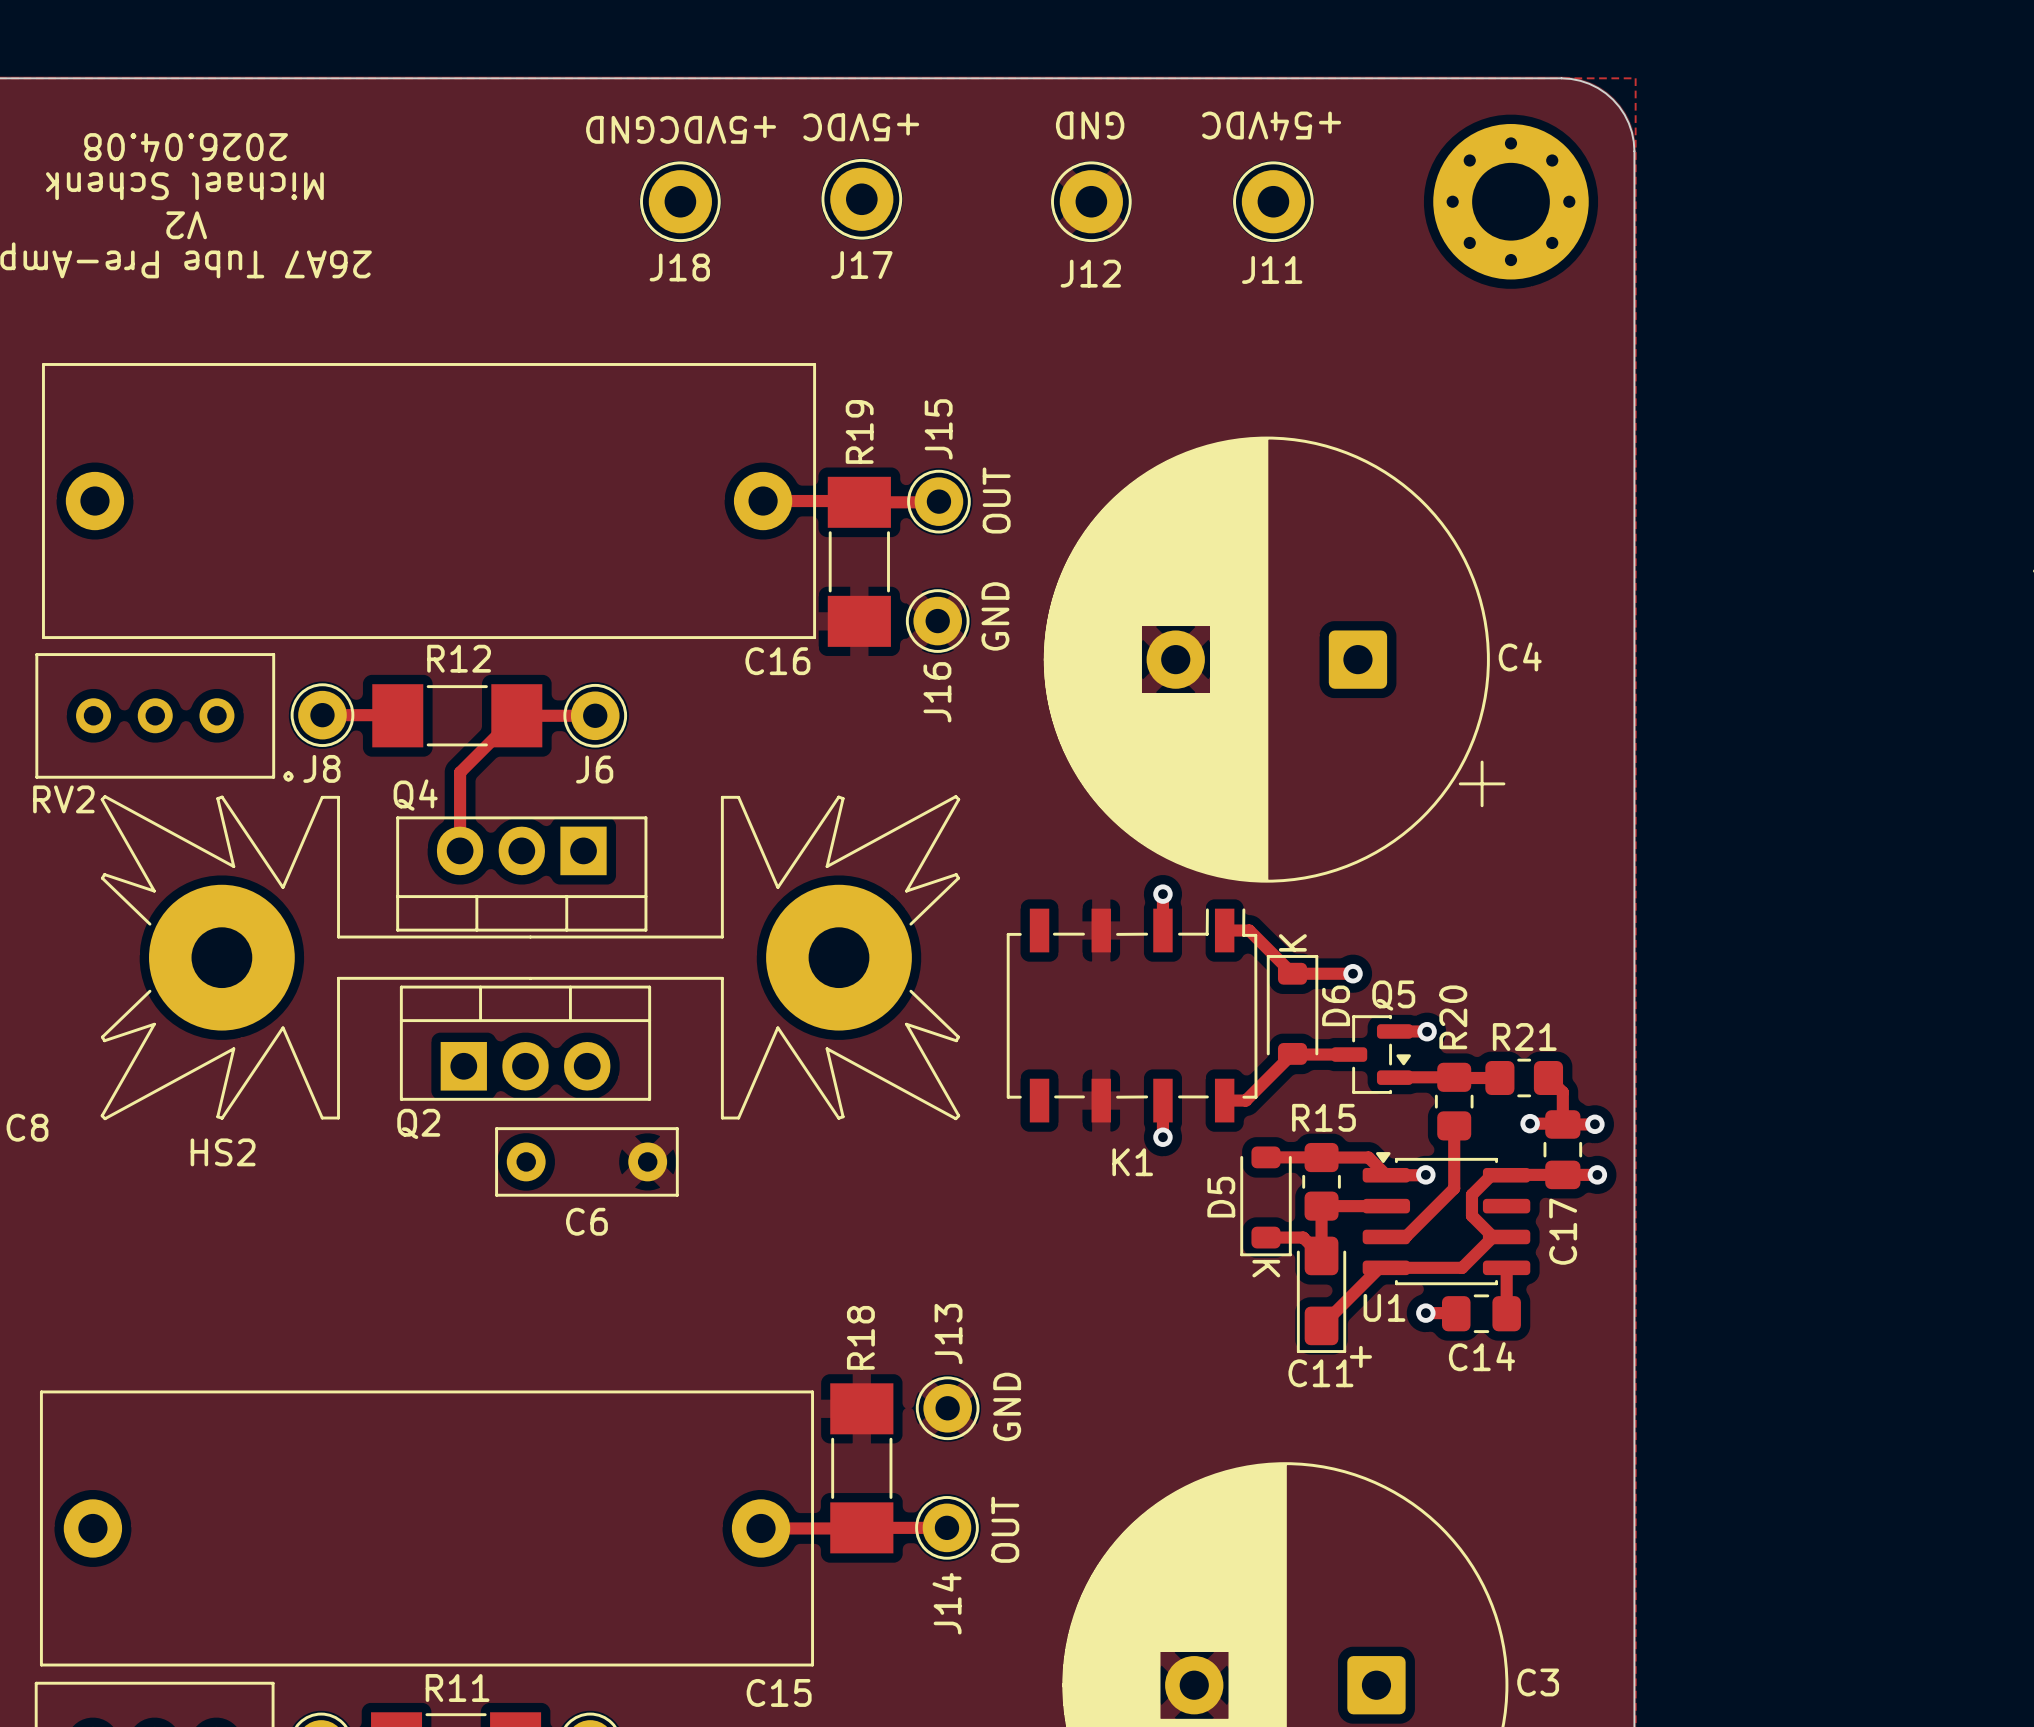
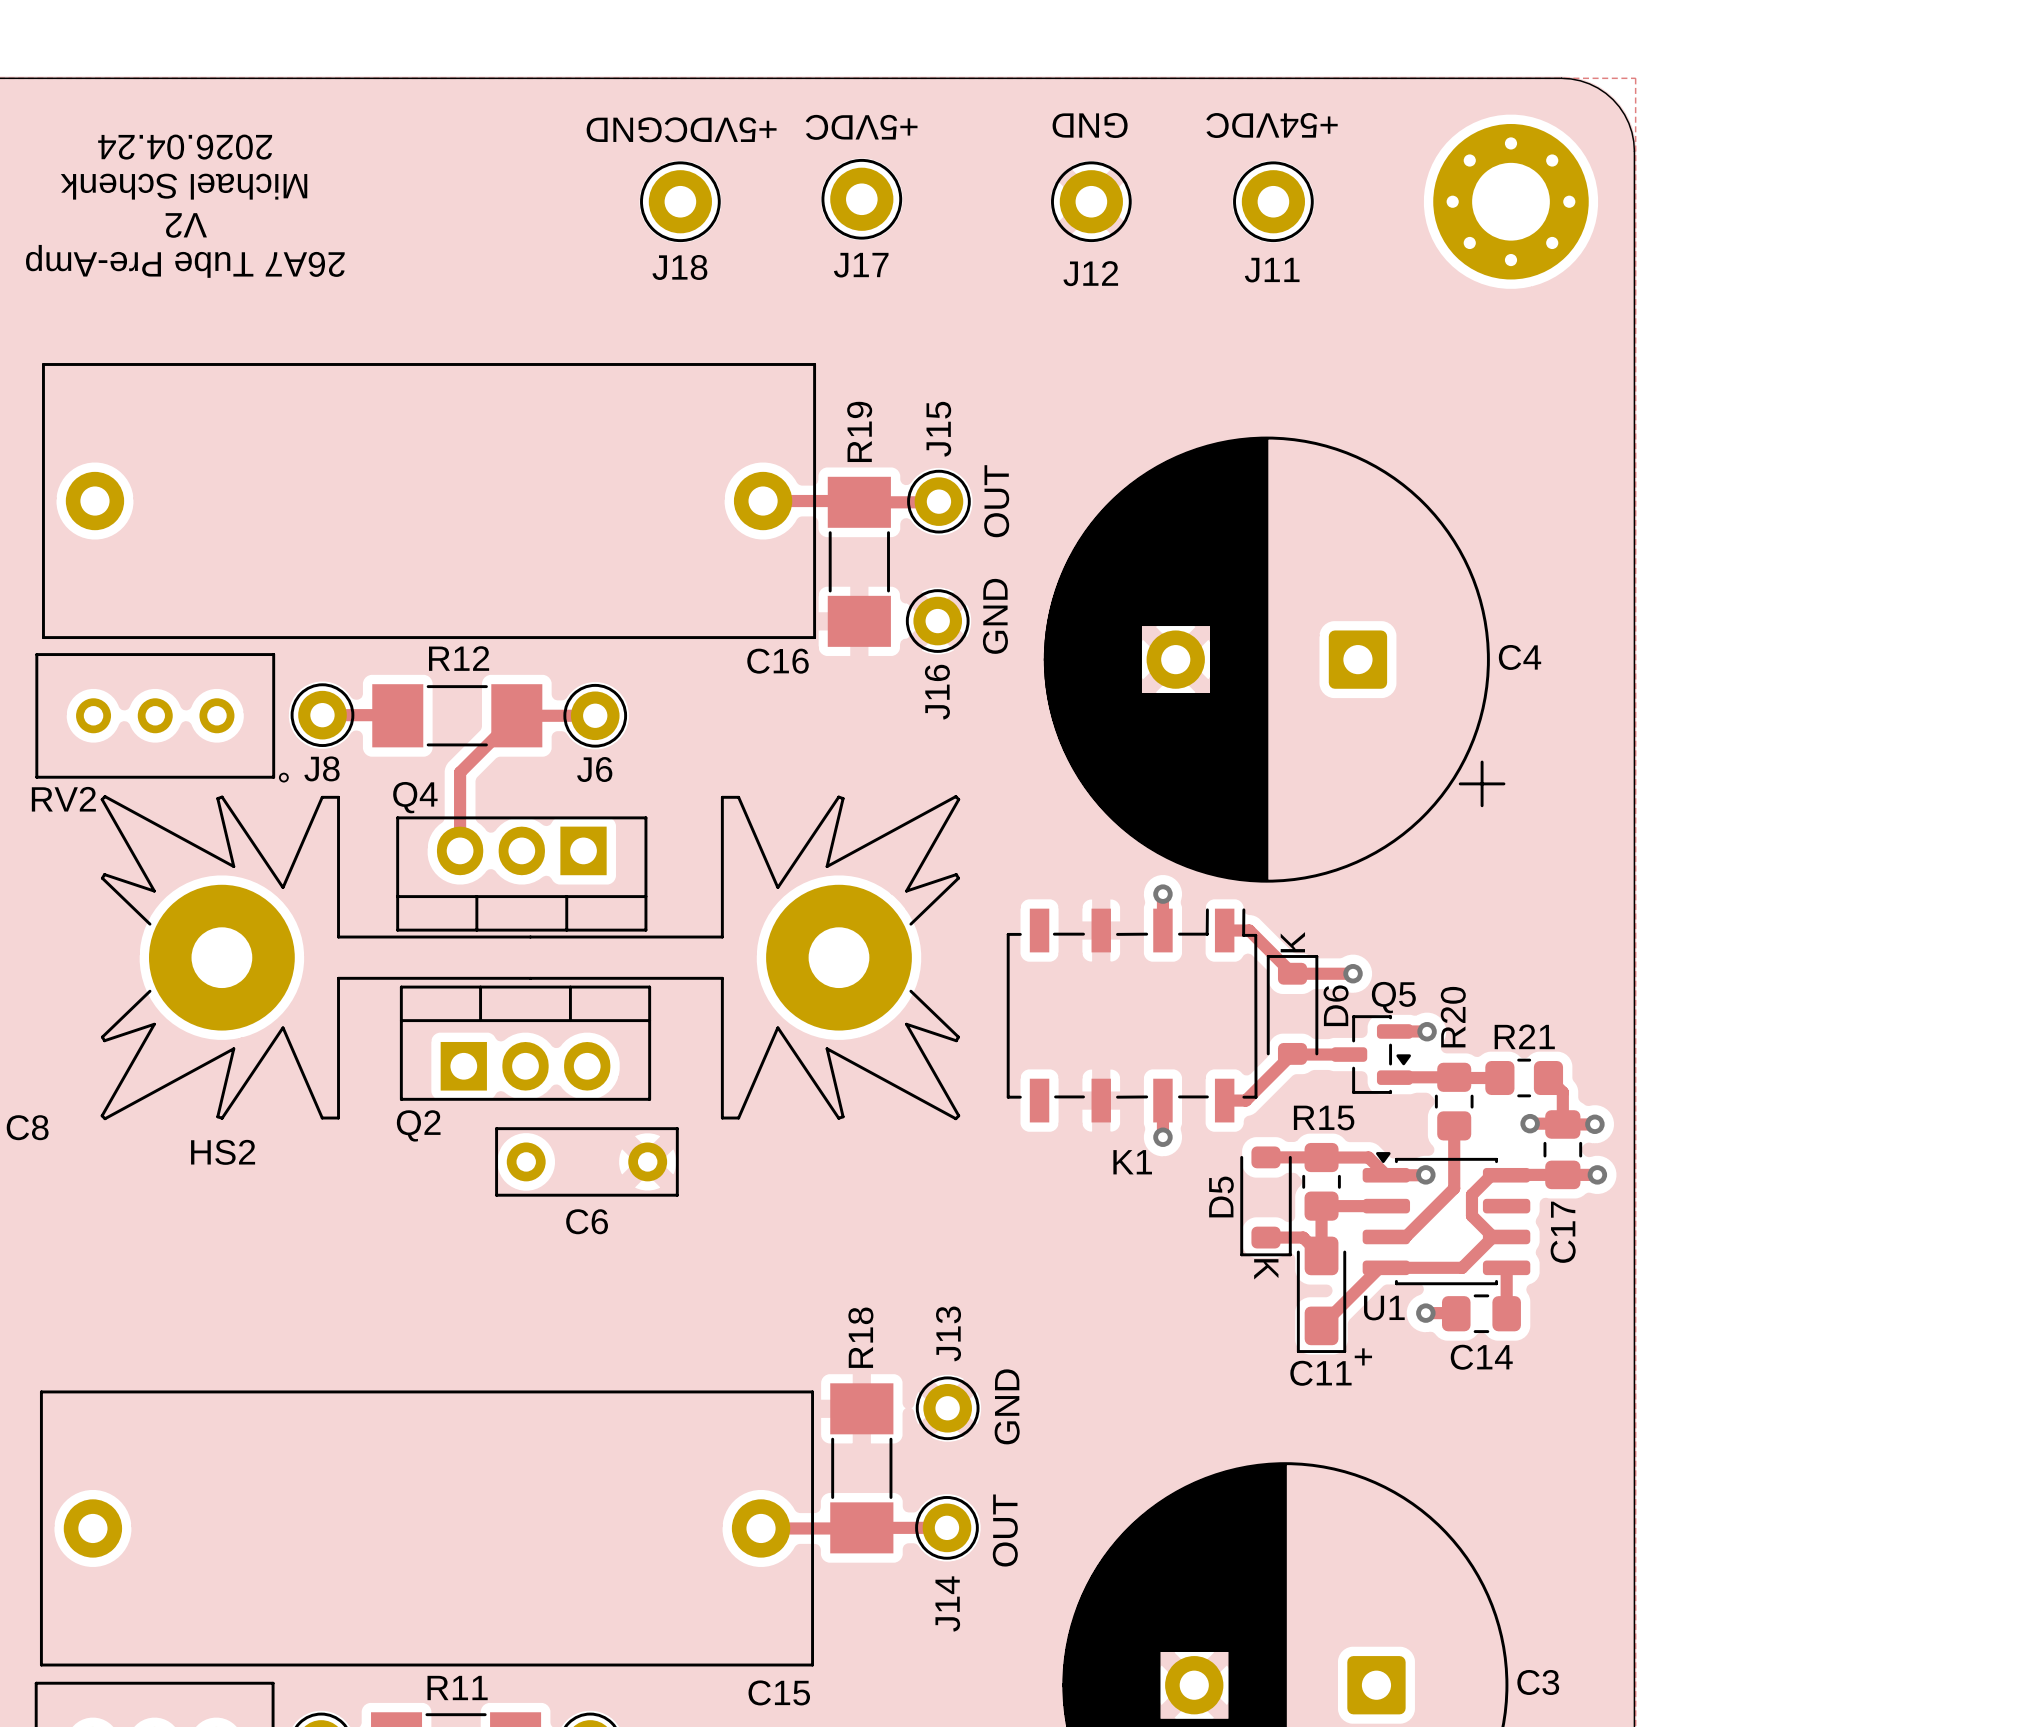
text: 2026.04.08 (186, 147) -> 2026.04.24 (185, 147)

